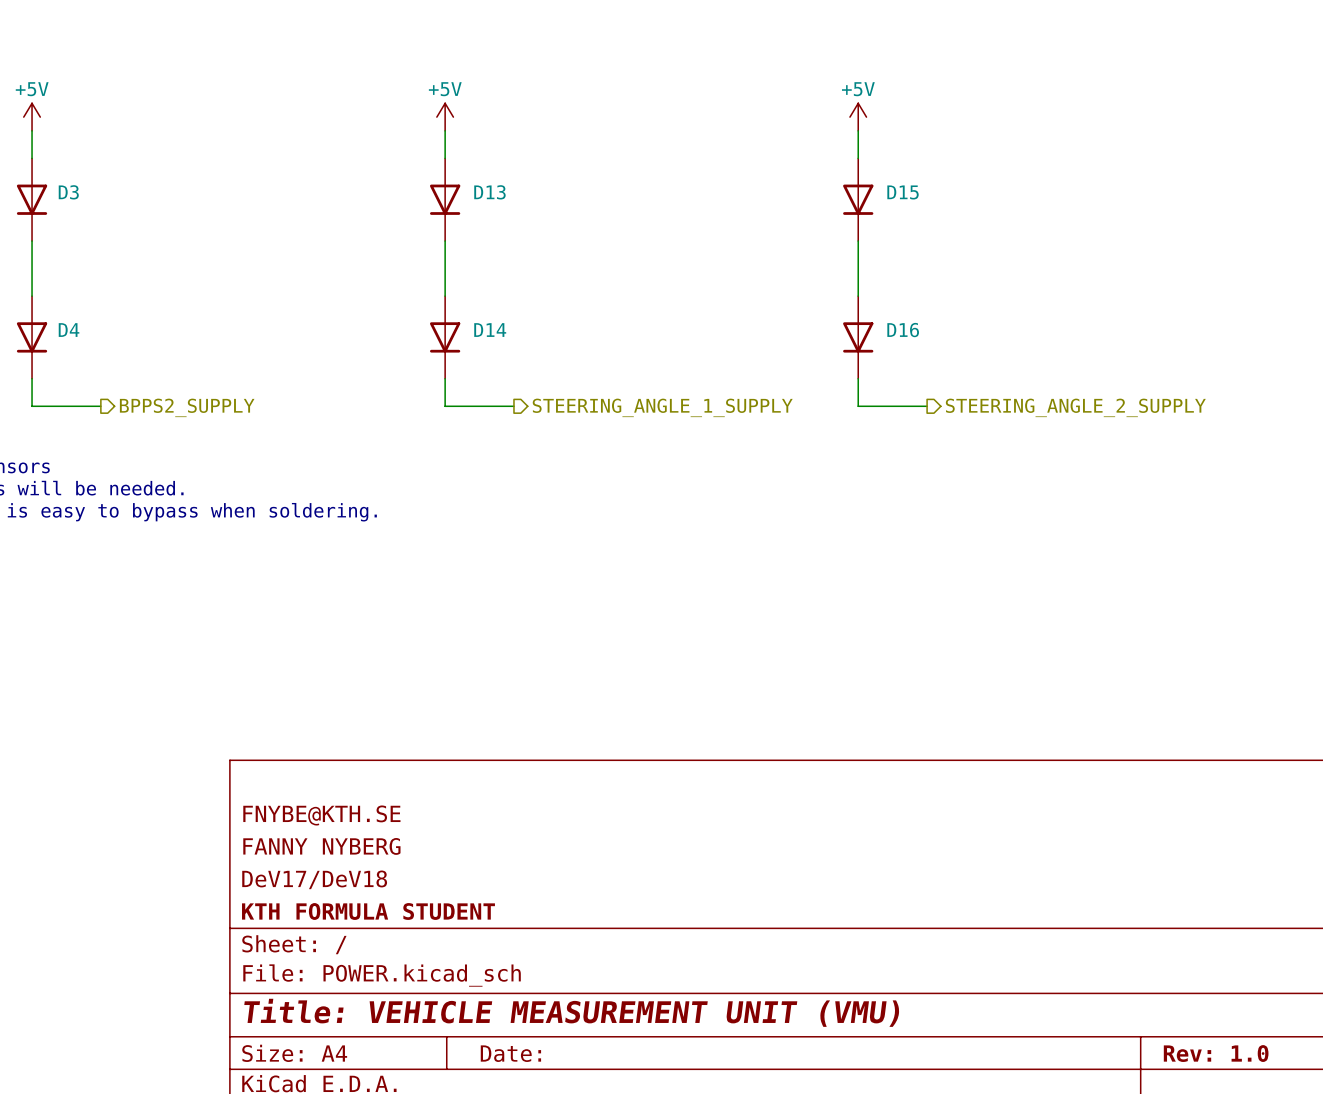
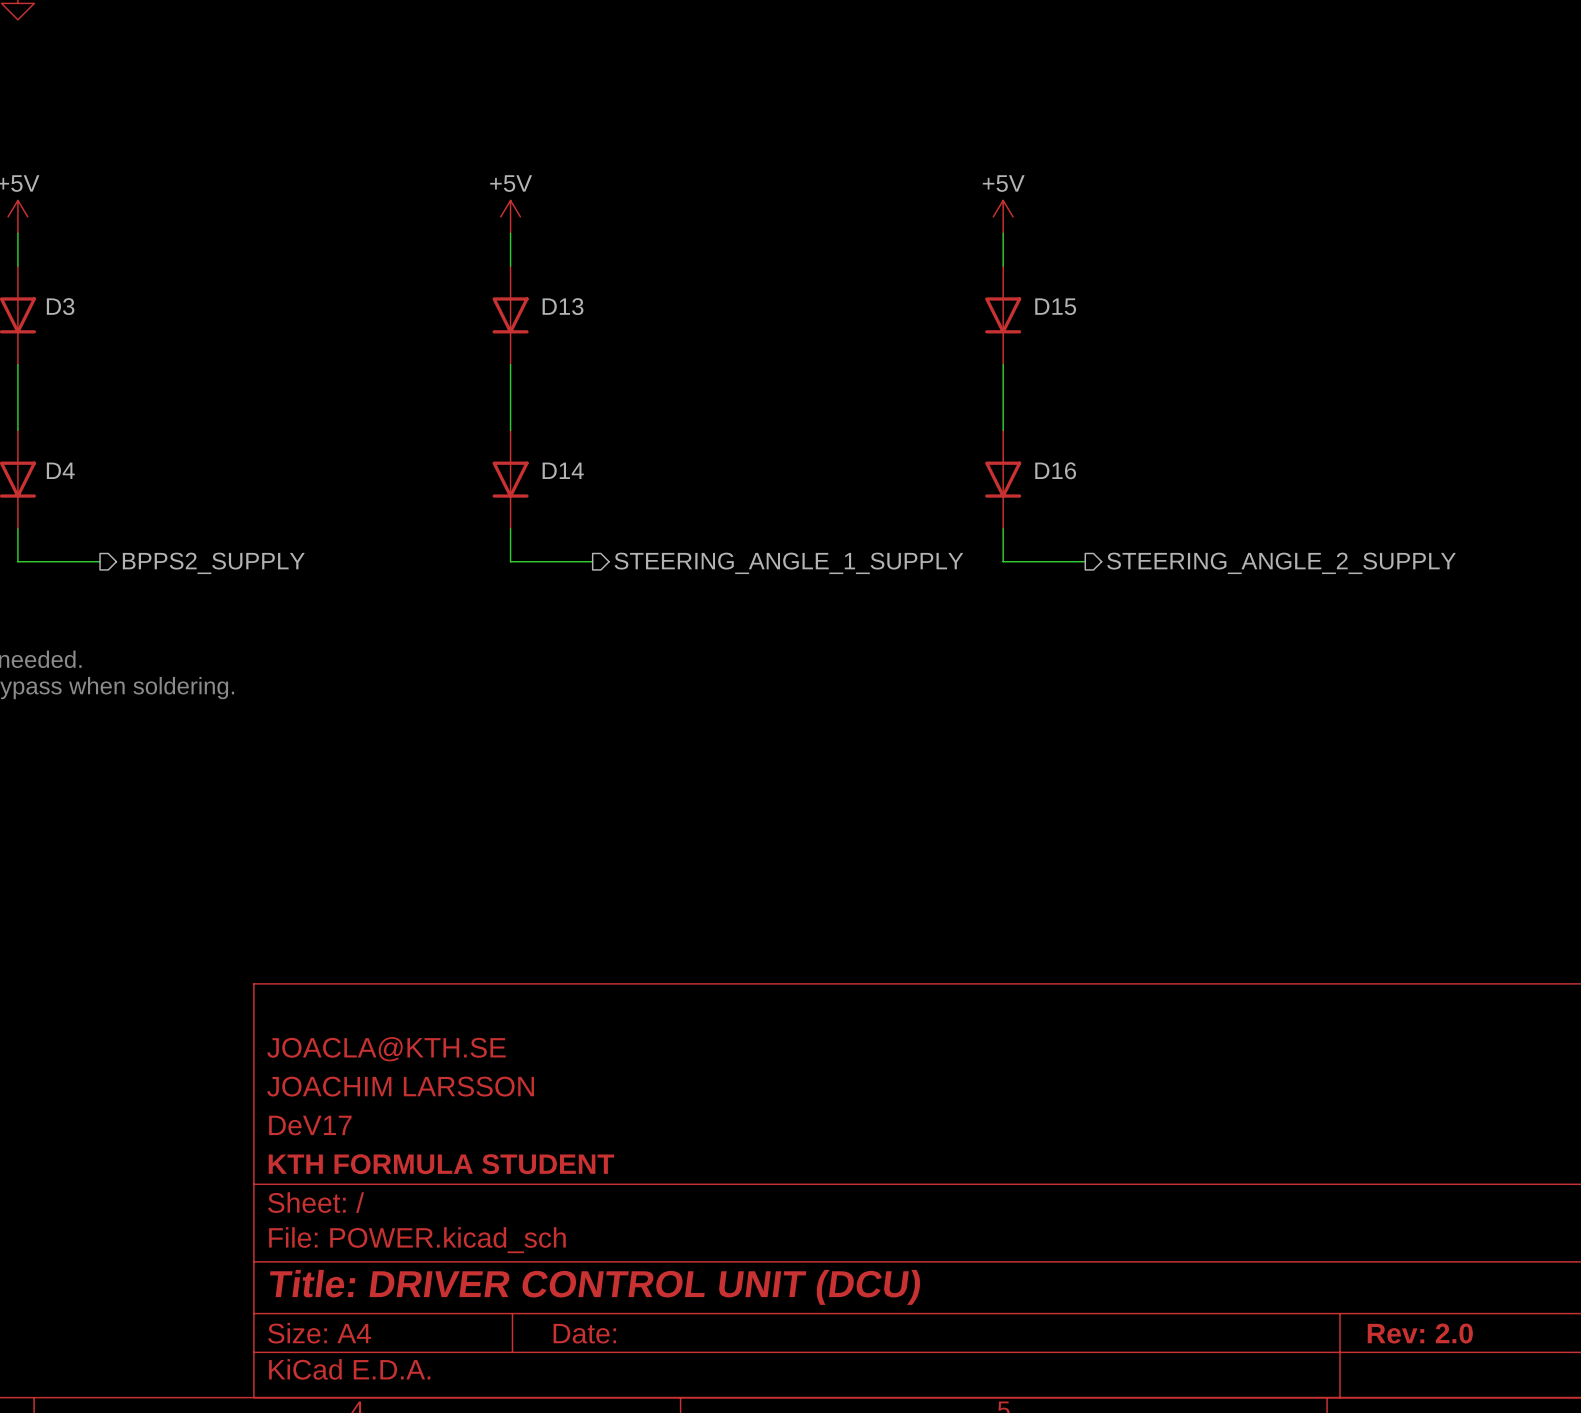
title block: FNYBE@KTH.SE (321, 815) -> JOACLA@KTH.SE (386, 1049)
title block: FANNY NYBERG (321, 846) -> JOACHIM LARSSON (400, 1086)
title block: DeV17/DeV18 (314, 879) -> DeV17 (310, 1125)
title block: Title: VEHICLE MEASUREMENT UNIT (VMU) (571, 1012) -> Title: DRIVER CONTROL UNIT (DCU) (595, 1287)
title block: Rev: 1.0 (1216, 1053) -> Rev: 2.0 (1420, 1333)

